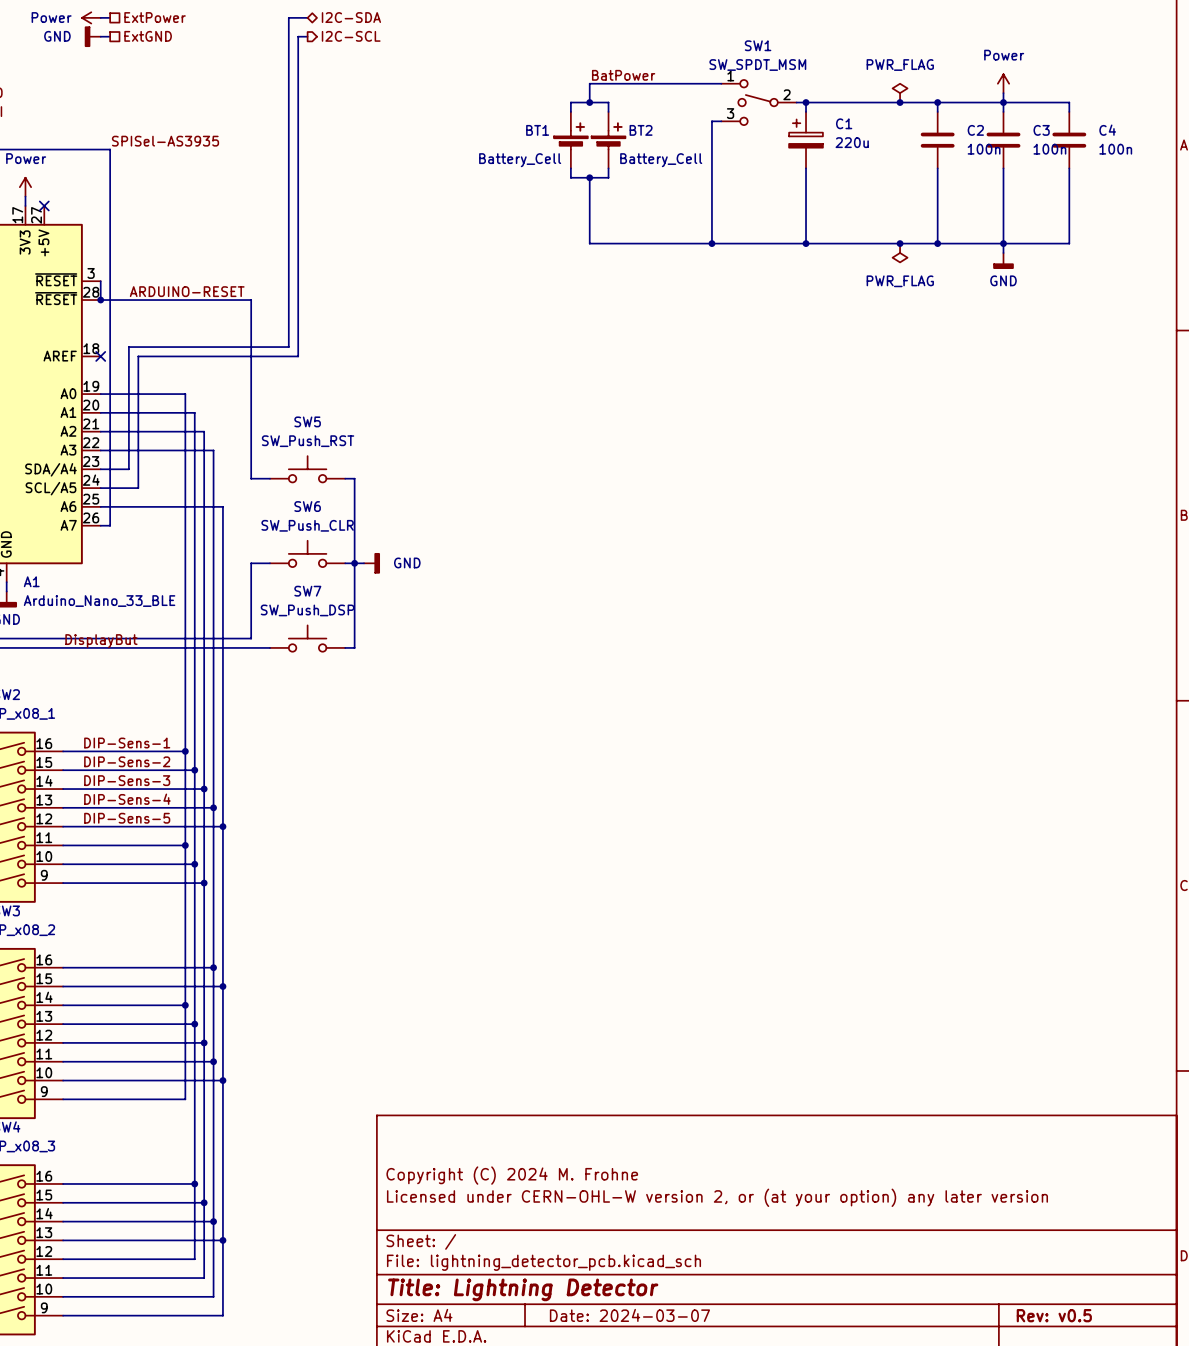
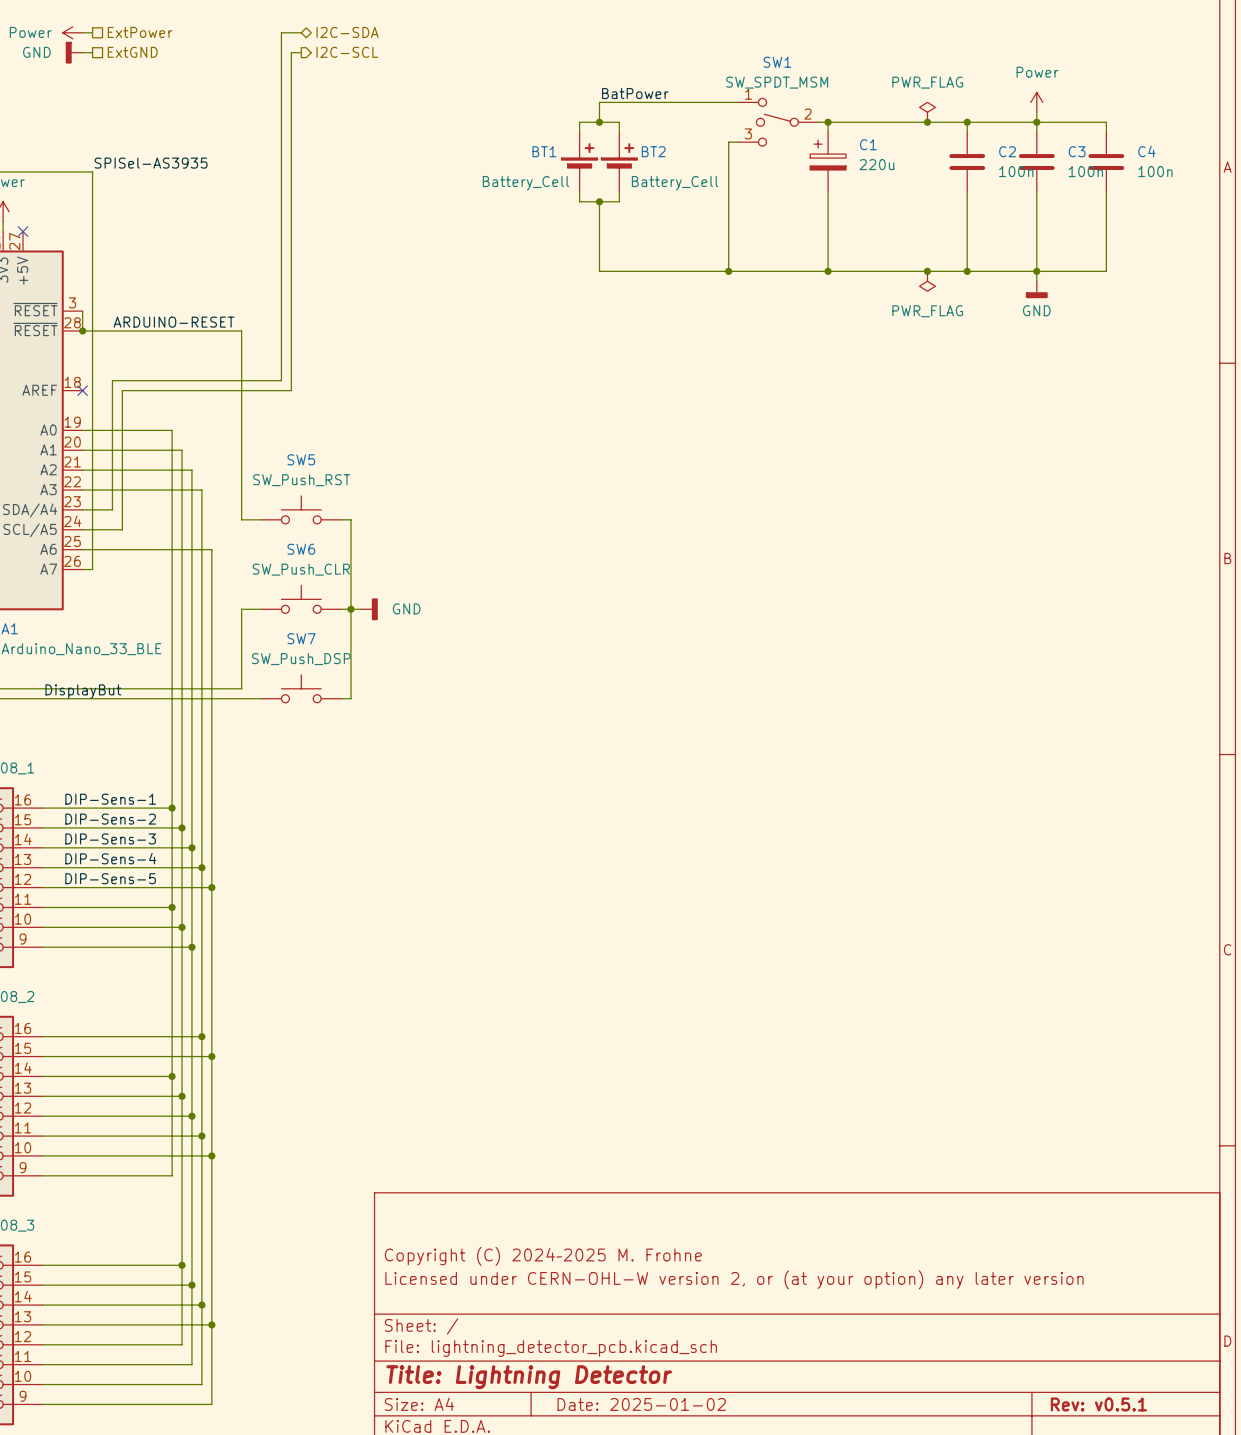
title block: Copyright (C) 2024 M. Frohne (512, 1175) -> Copyright (C) 2024–2025 M. Frohne (543, 1256)
title block: Date: 2024-03-07 (629, 1315) -> Date: 2025-01-02 (641, 1404)
title block: Rev: v0.5 (1054, 1315) -> Rev: v0.5.1 (1098, 1404)

